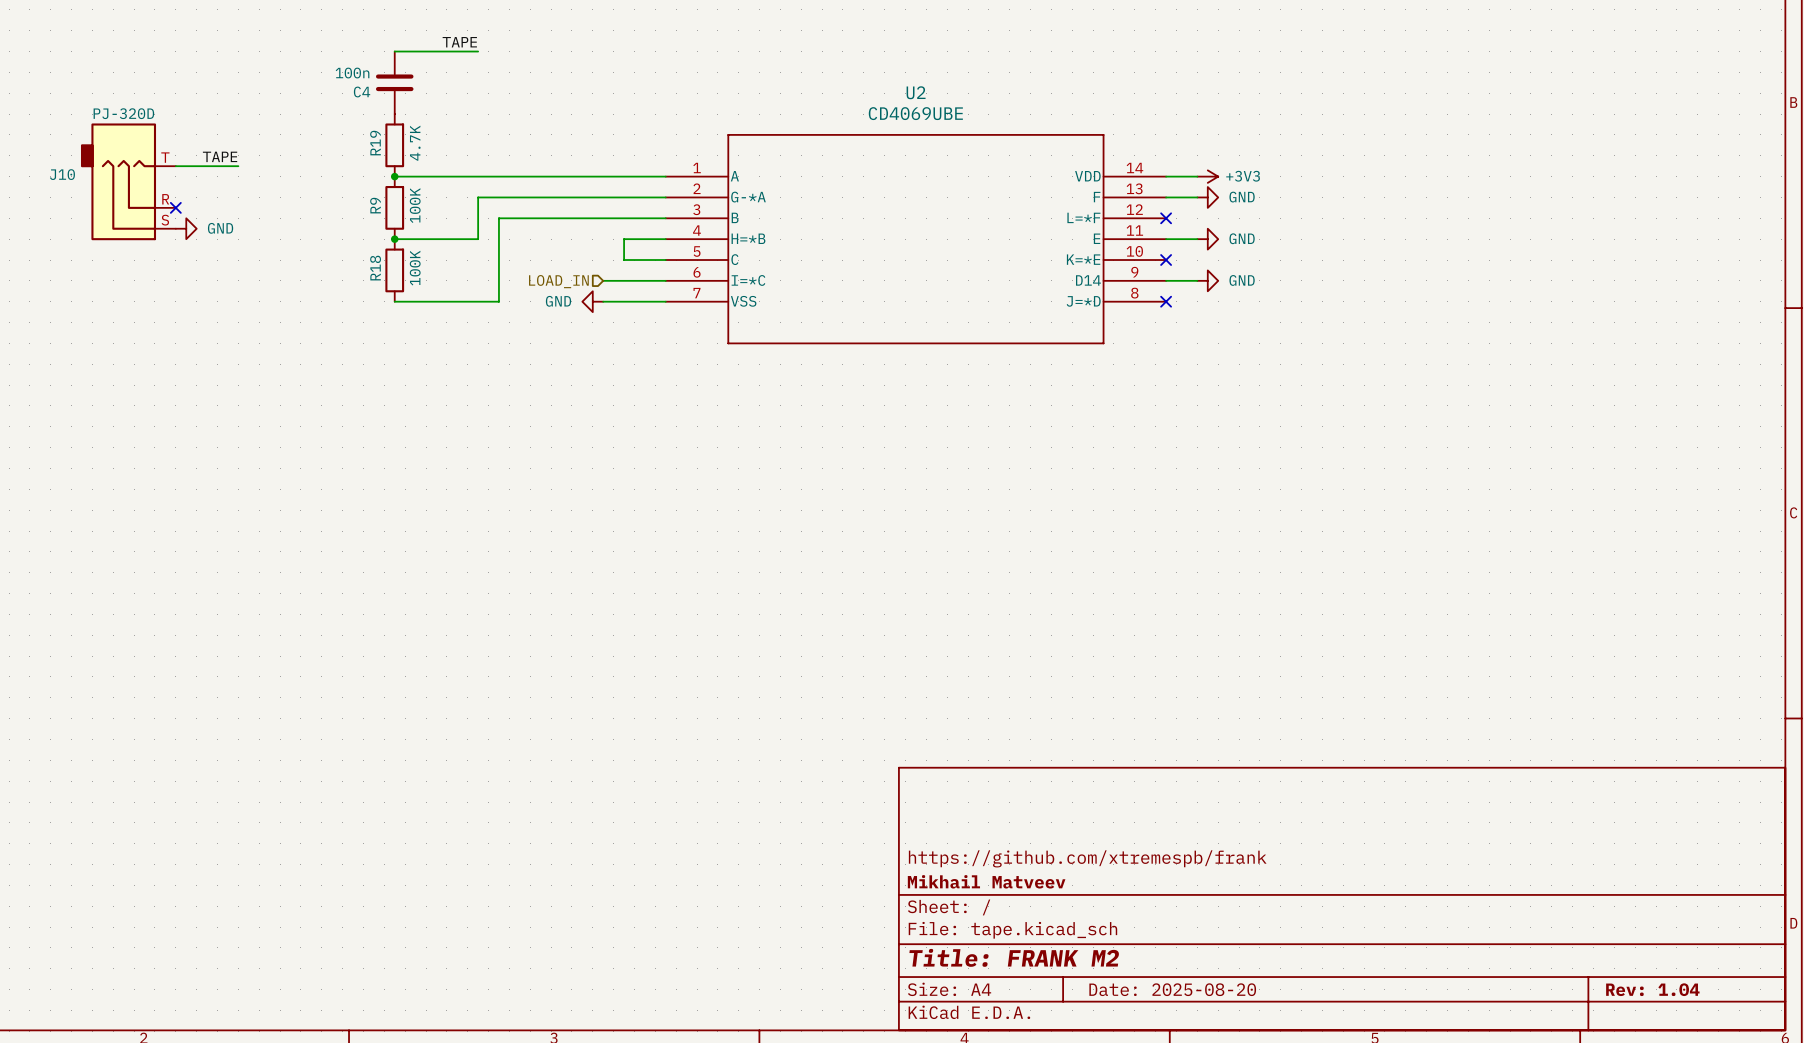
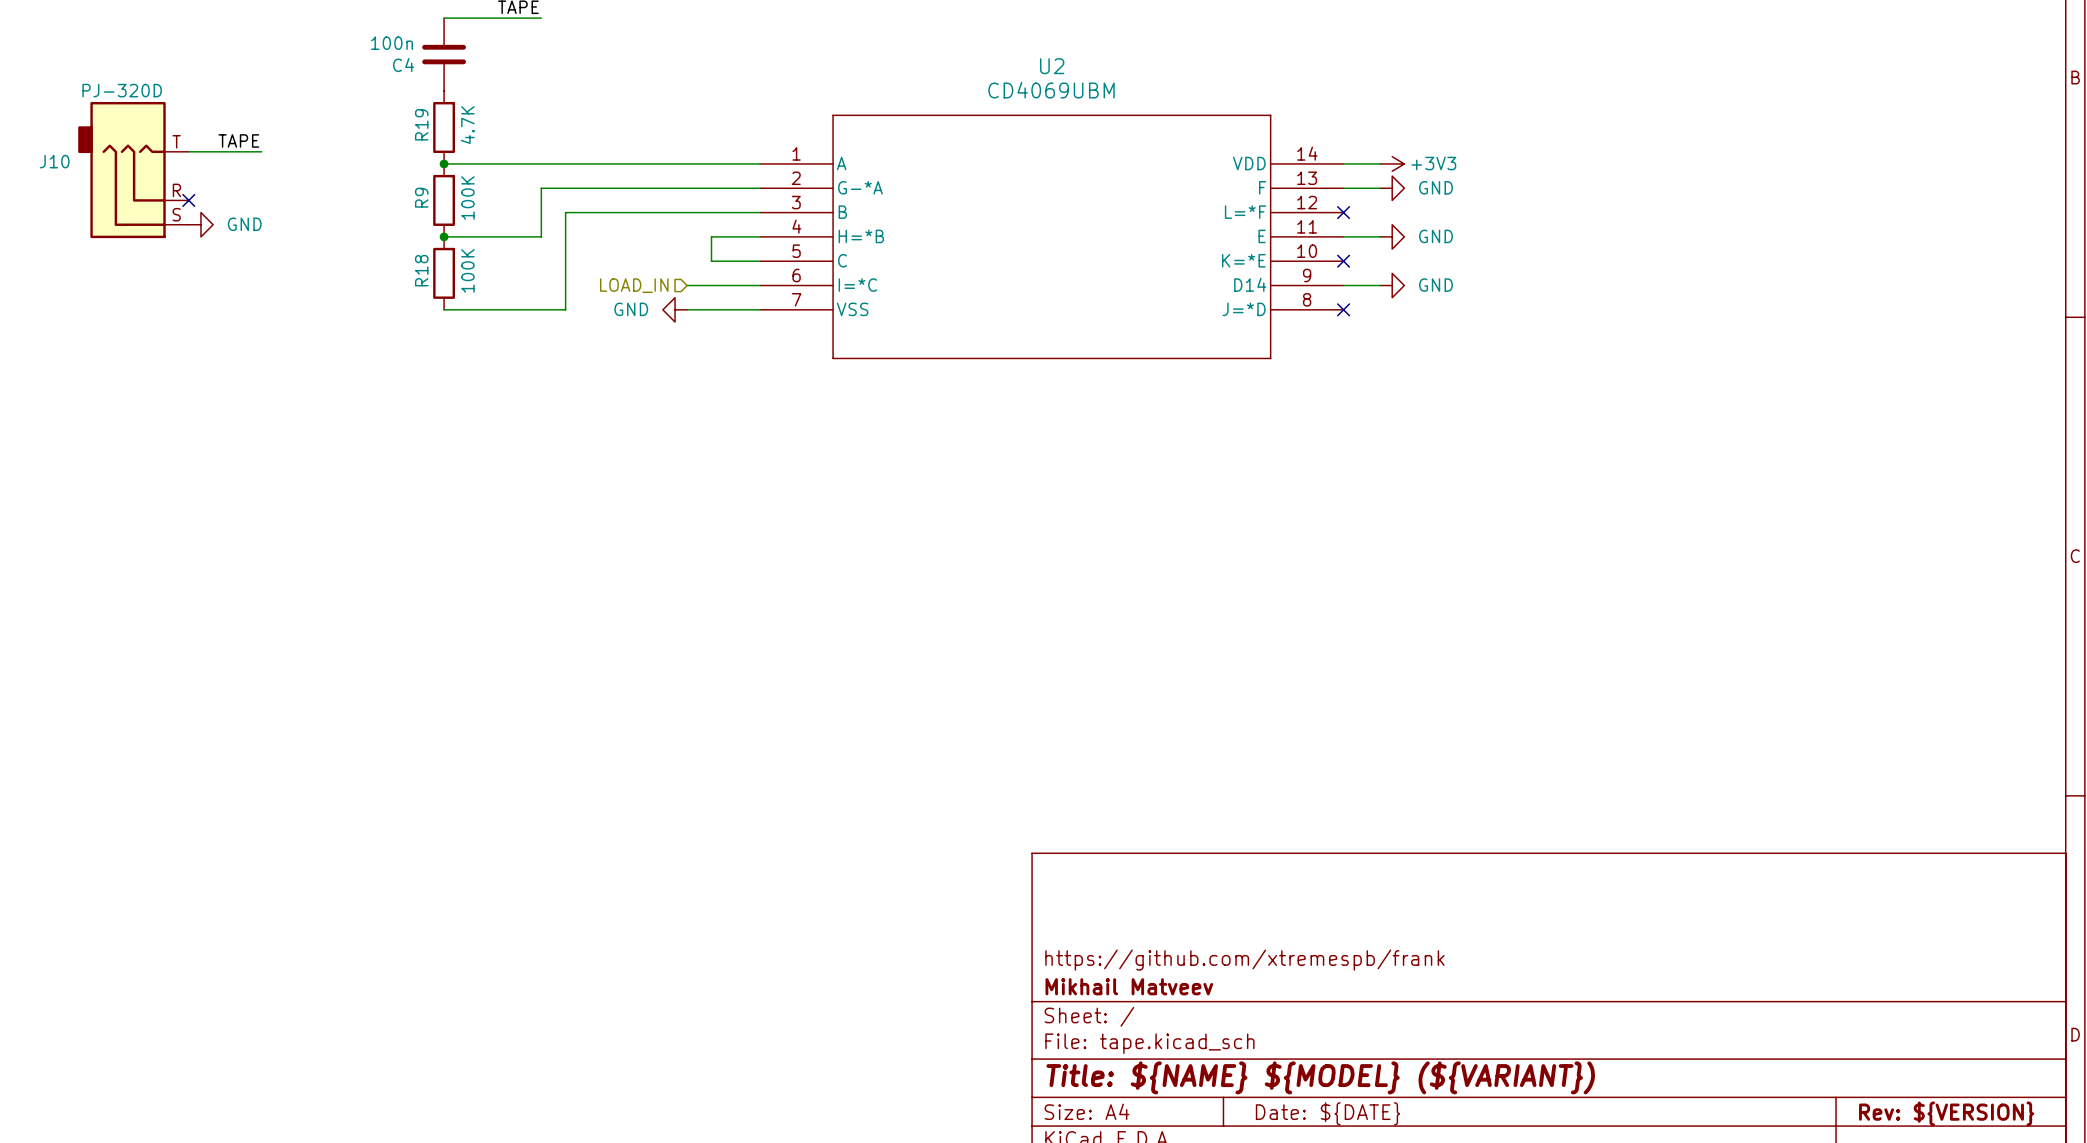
U2 value: CD4069UBE (915, 113) -> CD4069UBM (1051, 90)
title block: Title: FRANK M2 (1014, 957) -> Title: ${NAME} ${MODEL} (${VARIANT}) (1320, 1077)
title block: Date: 2025-08-20 (1172, 989) -> Date: ${DATE} (1328, 1113)
title block: Rev: 1.04 (1652, 989) -> Rev: ${VERSION} (1946, 1113)

